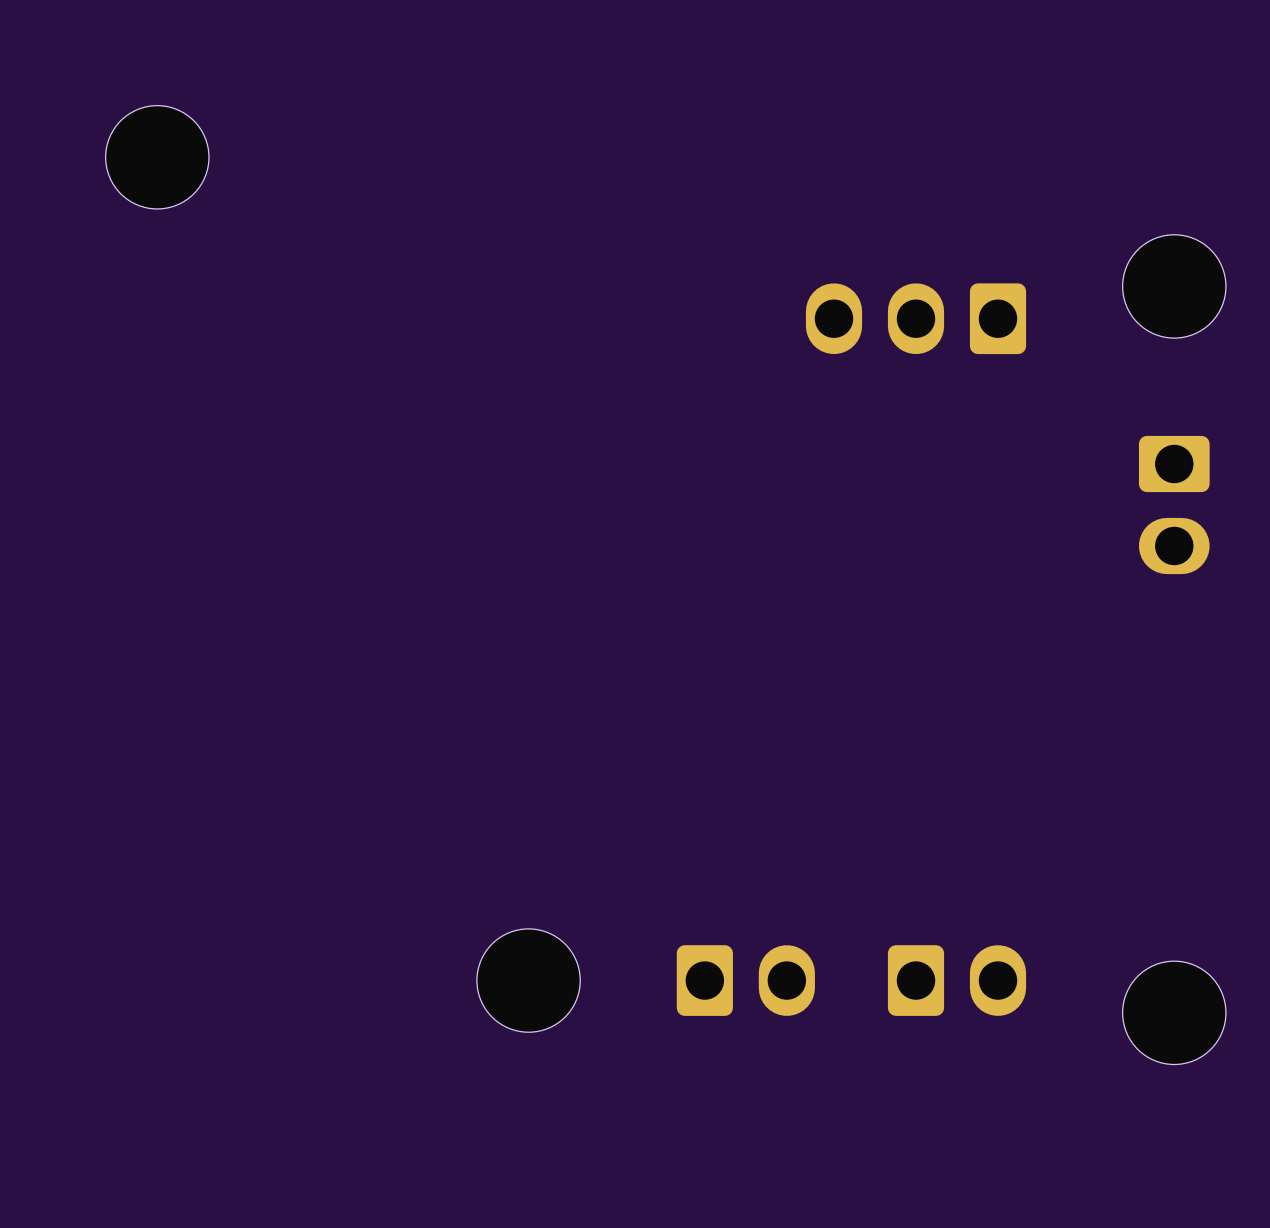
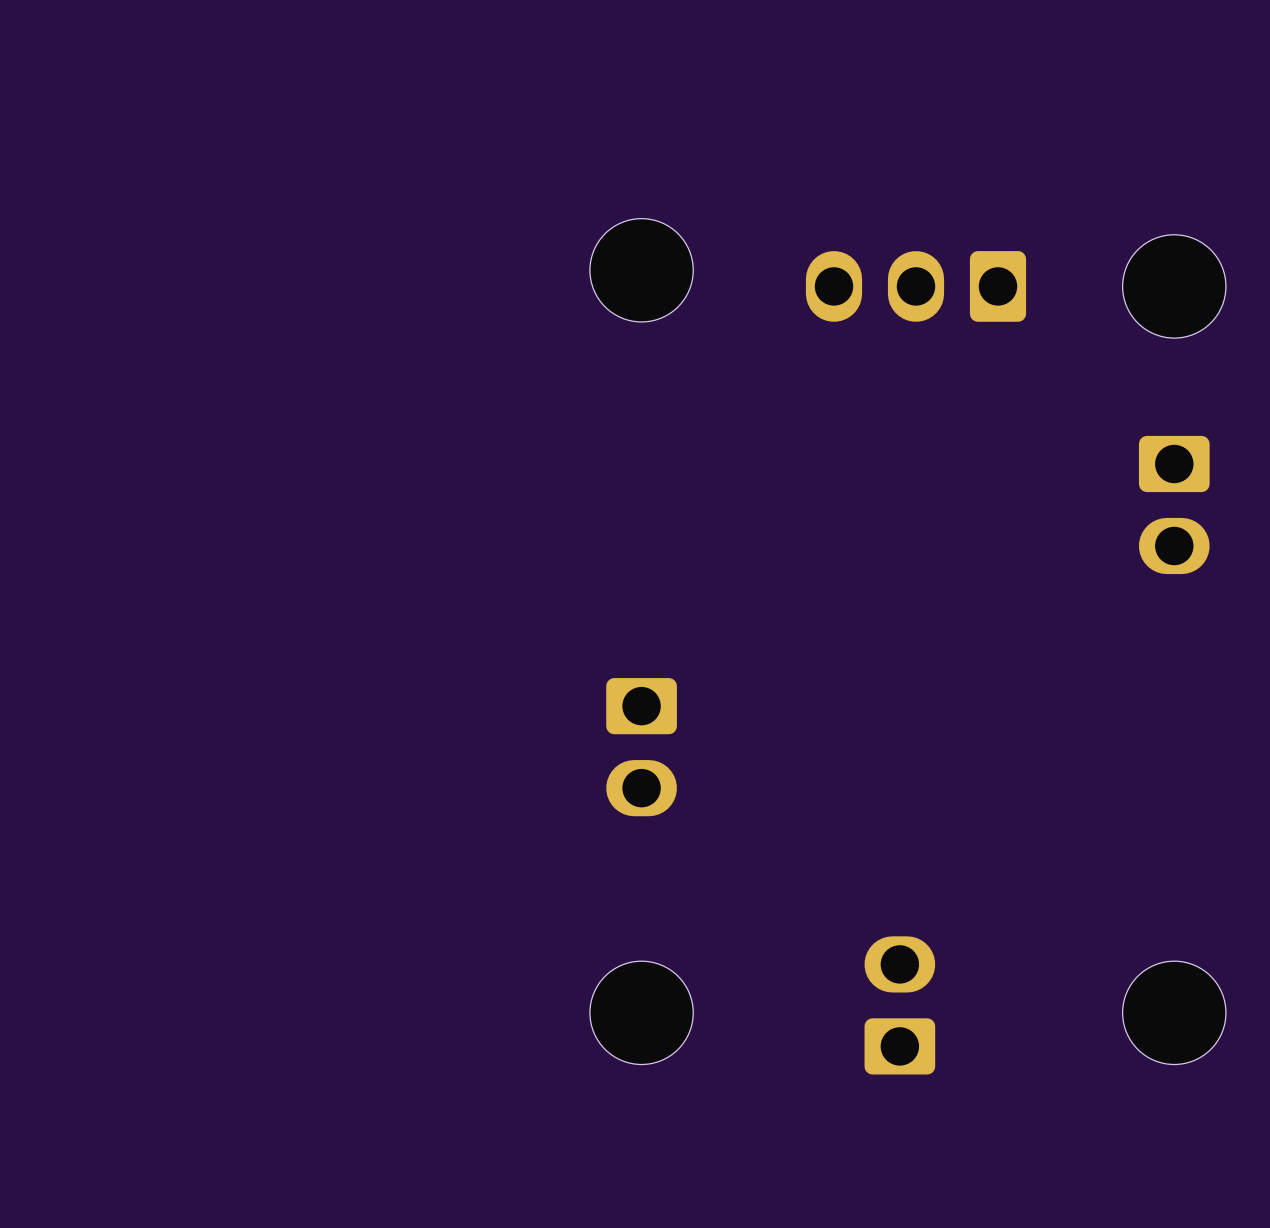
part: (157, 157) -> none
part: none -> (641, 270)
part position: (916, 318) -> (916, 286)
part: none -> (641, 747)
part position: (528, 980) -> (641, 1012)
part: (745, 980) -> none
part rotation: 0° (957, 980) -> 90° counterclockwise (899, 1005)

